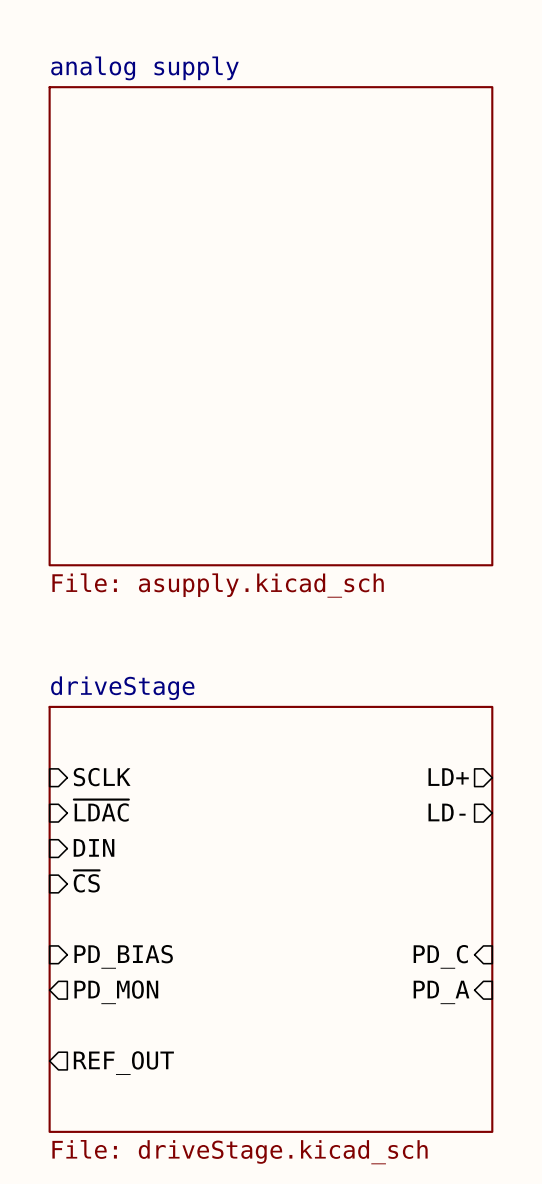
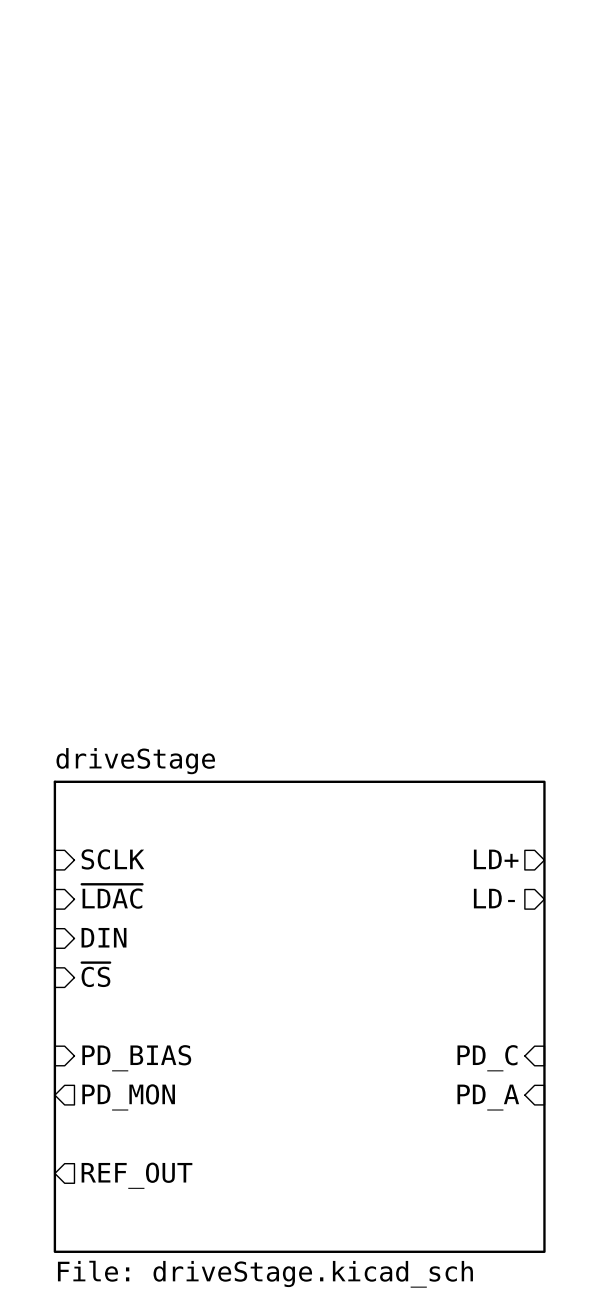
sheet analog supply: File: asupply.kicad_sch (270, 326) -> none

